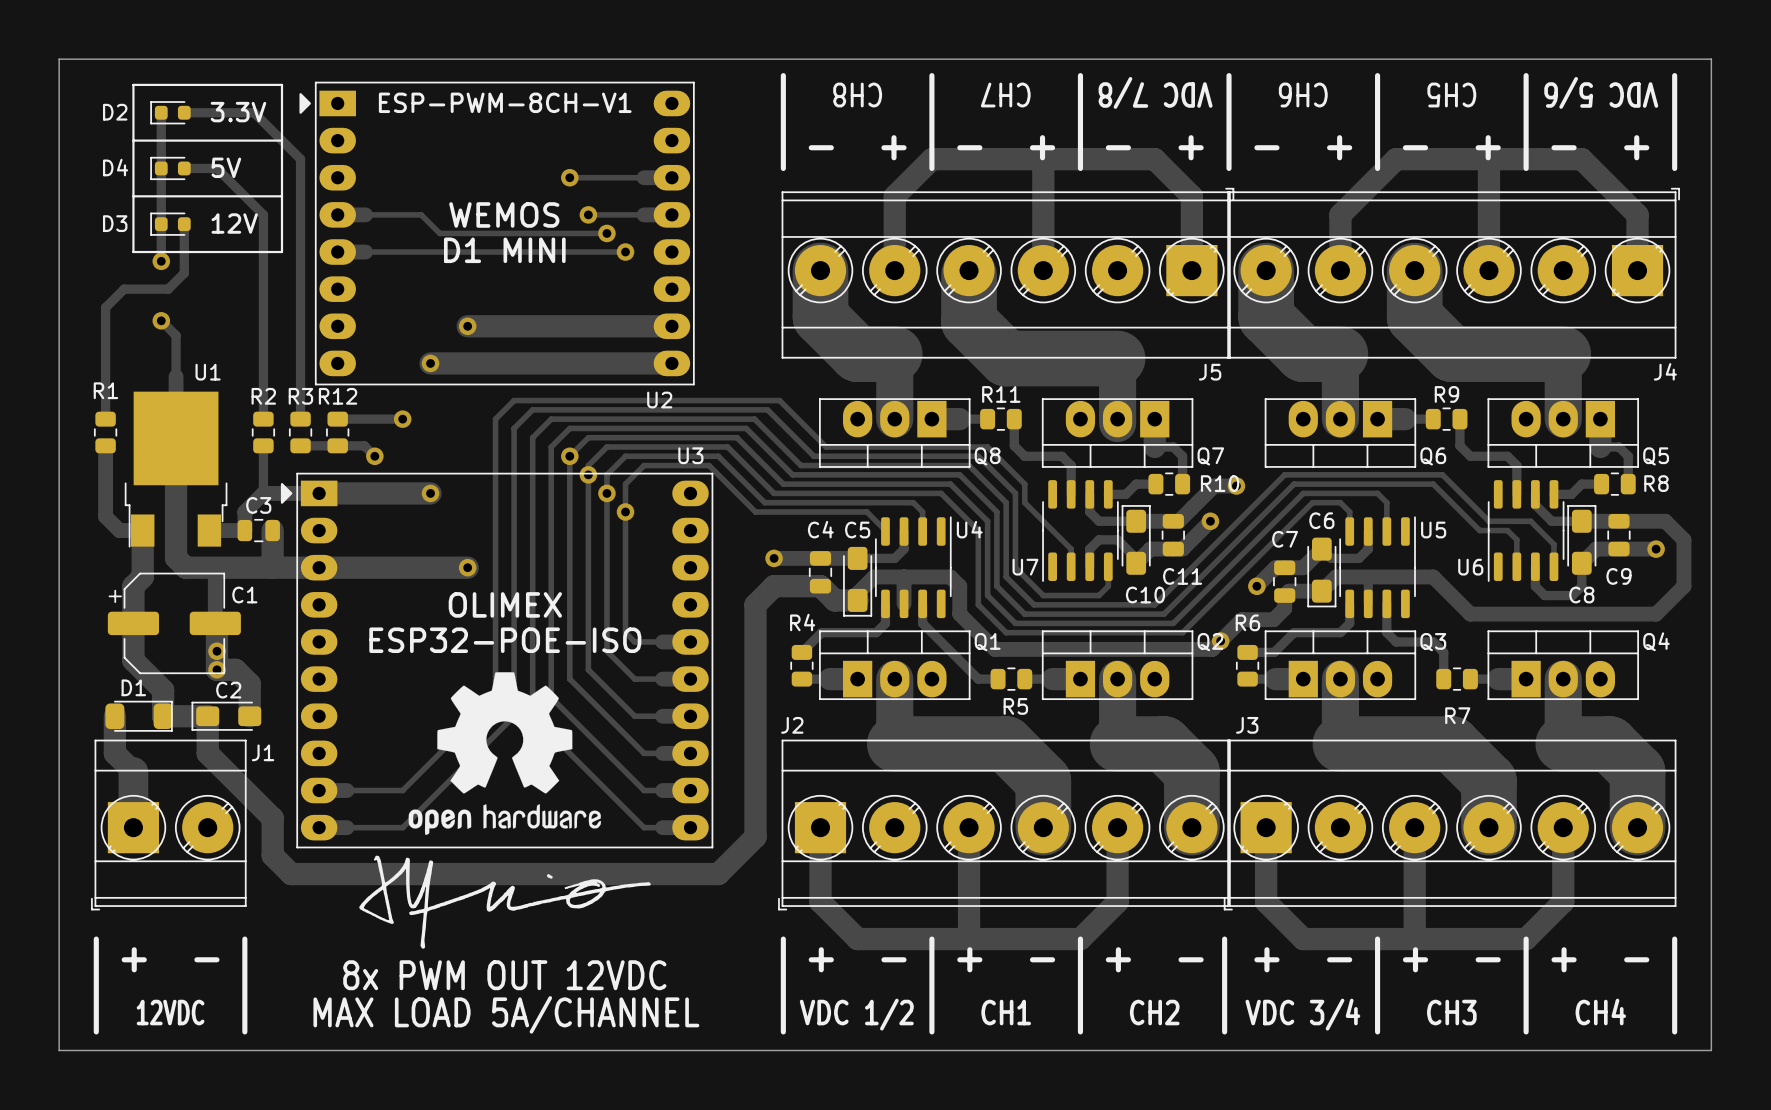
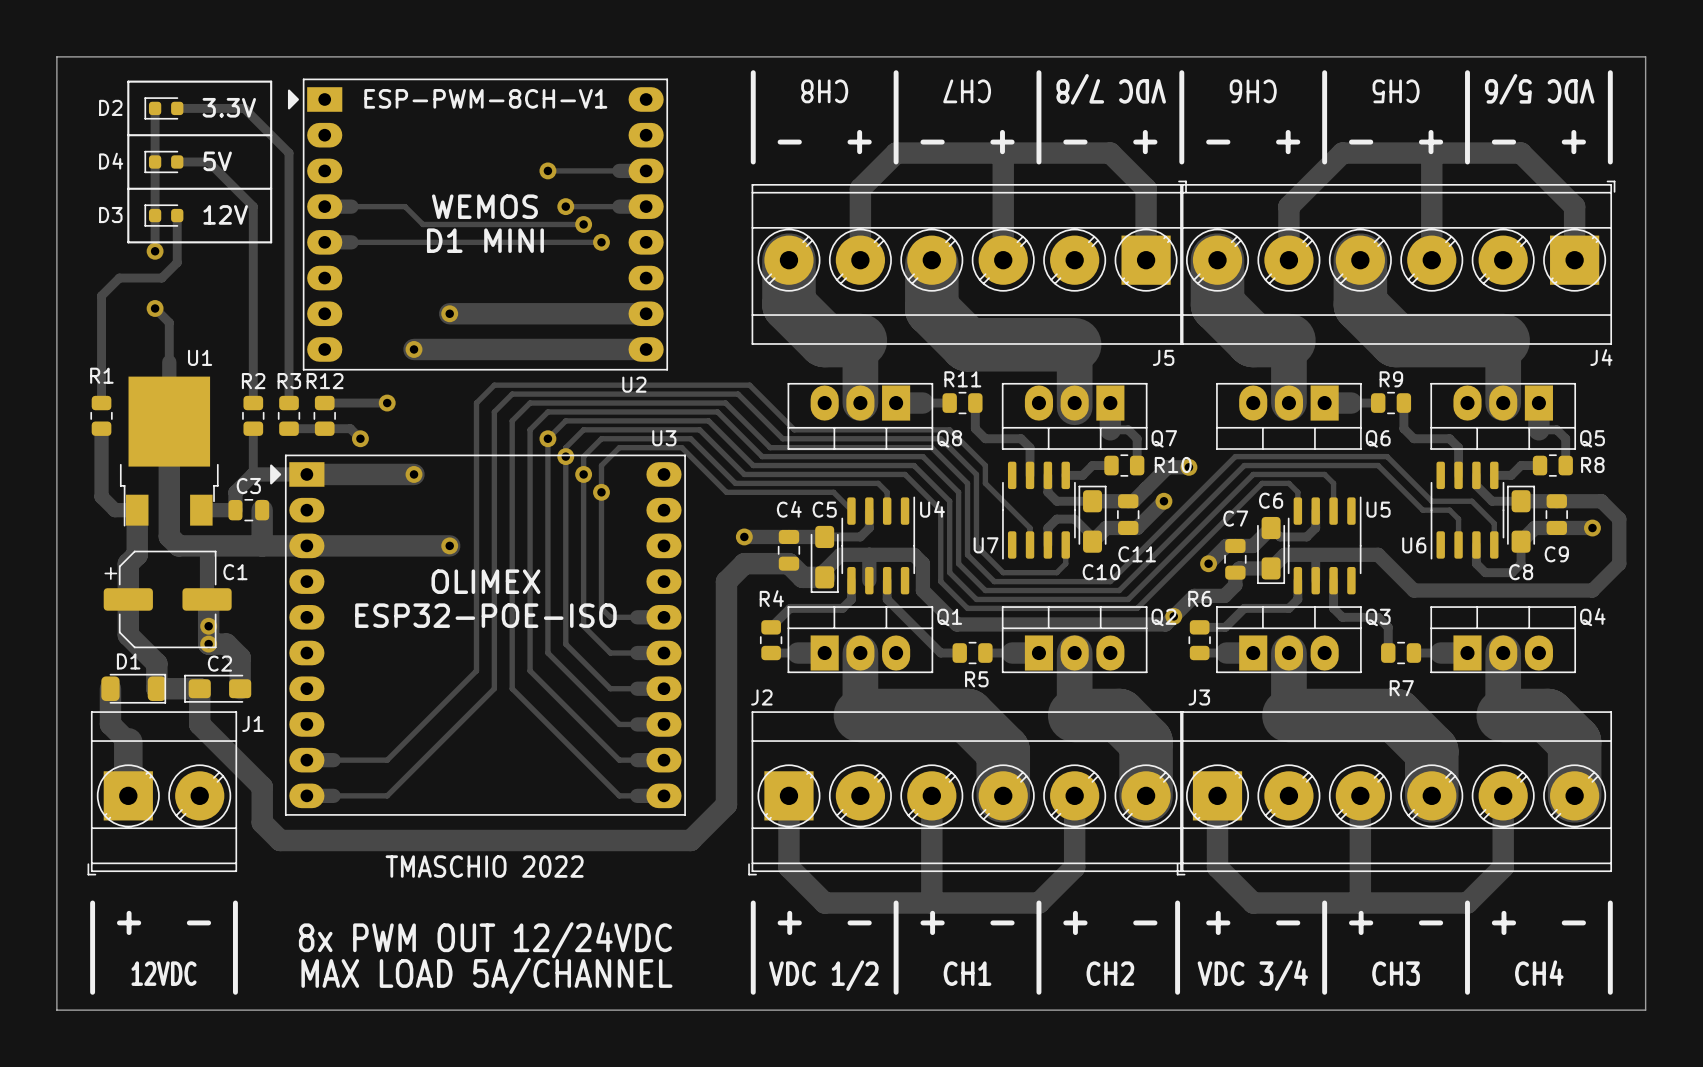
drawing: [408, 672, 601, 835] -> none
drawing: [359, 855, 651, 949] -> none
text: none -> TMASCHIO 2022 (484, 866)
text: 8x PWM OUT 12VDC (504, 975) -> 8x PWM OUT 12/24VDC (485, 940)

